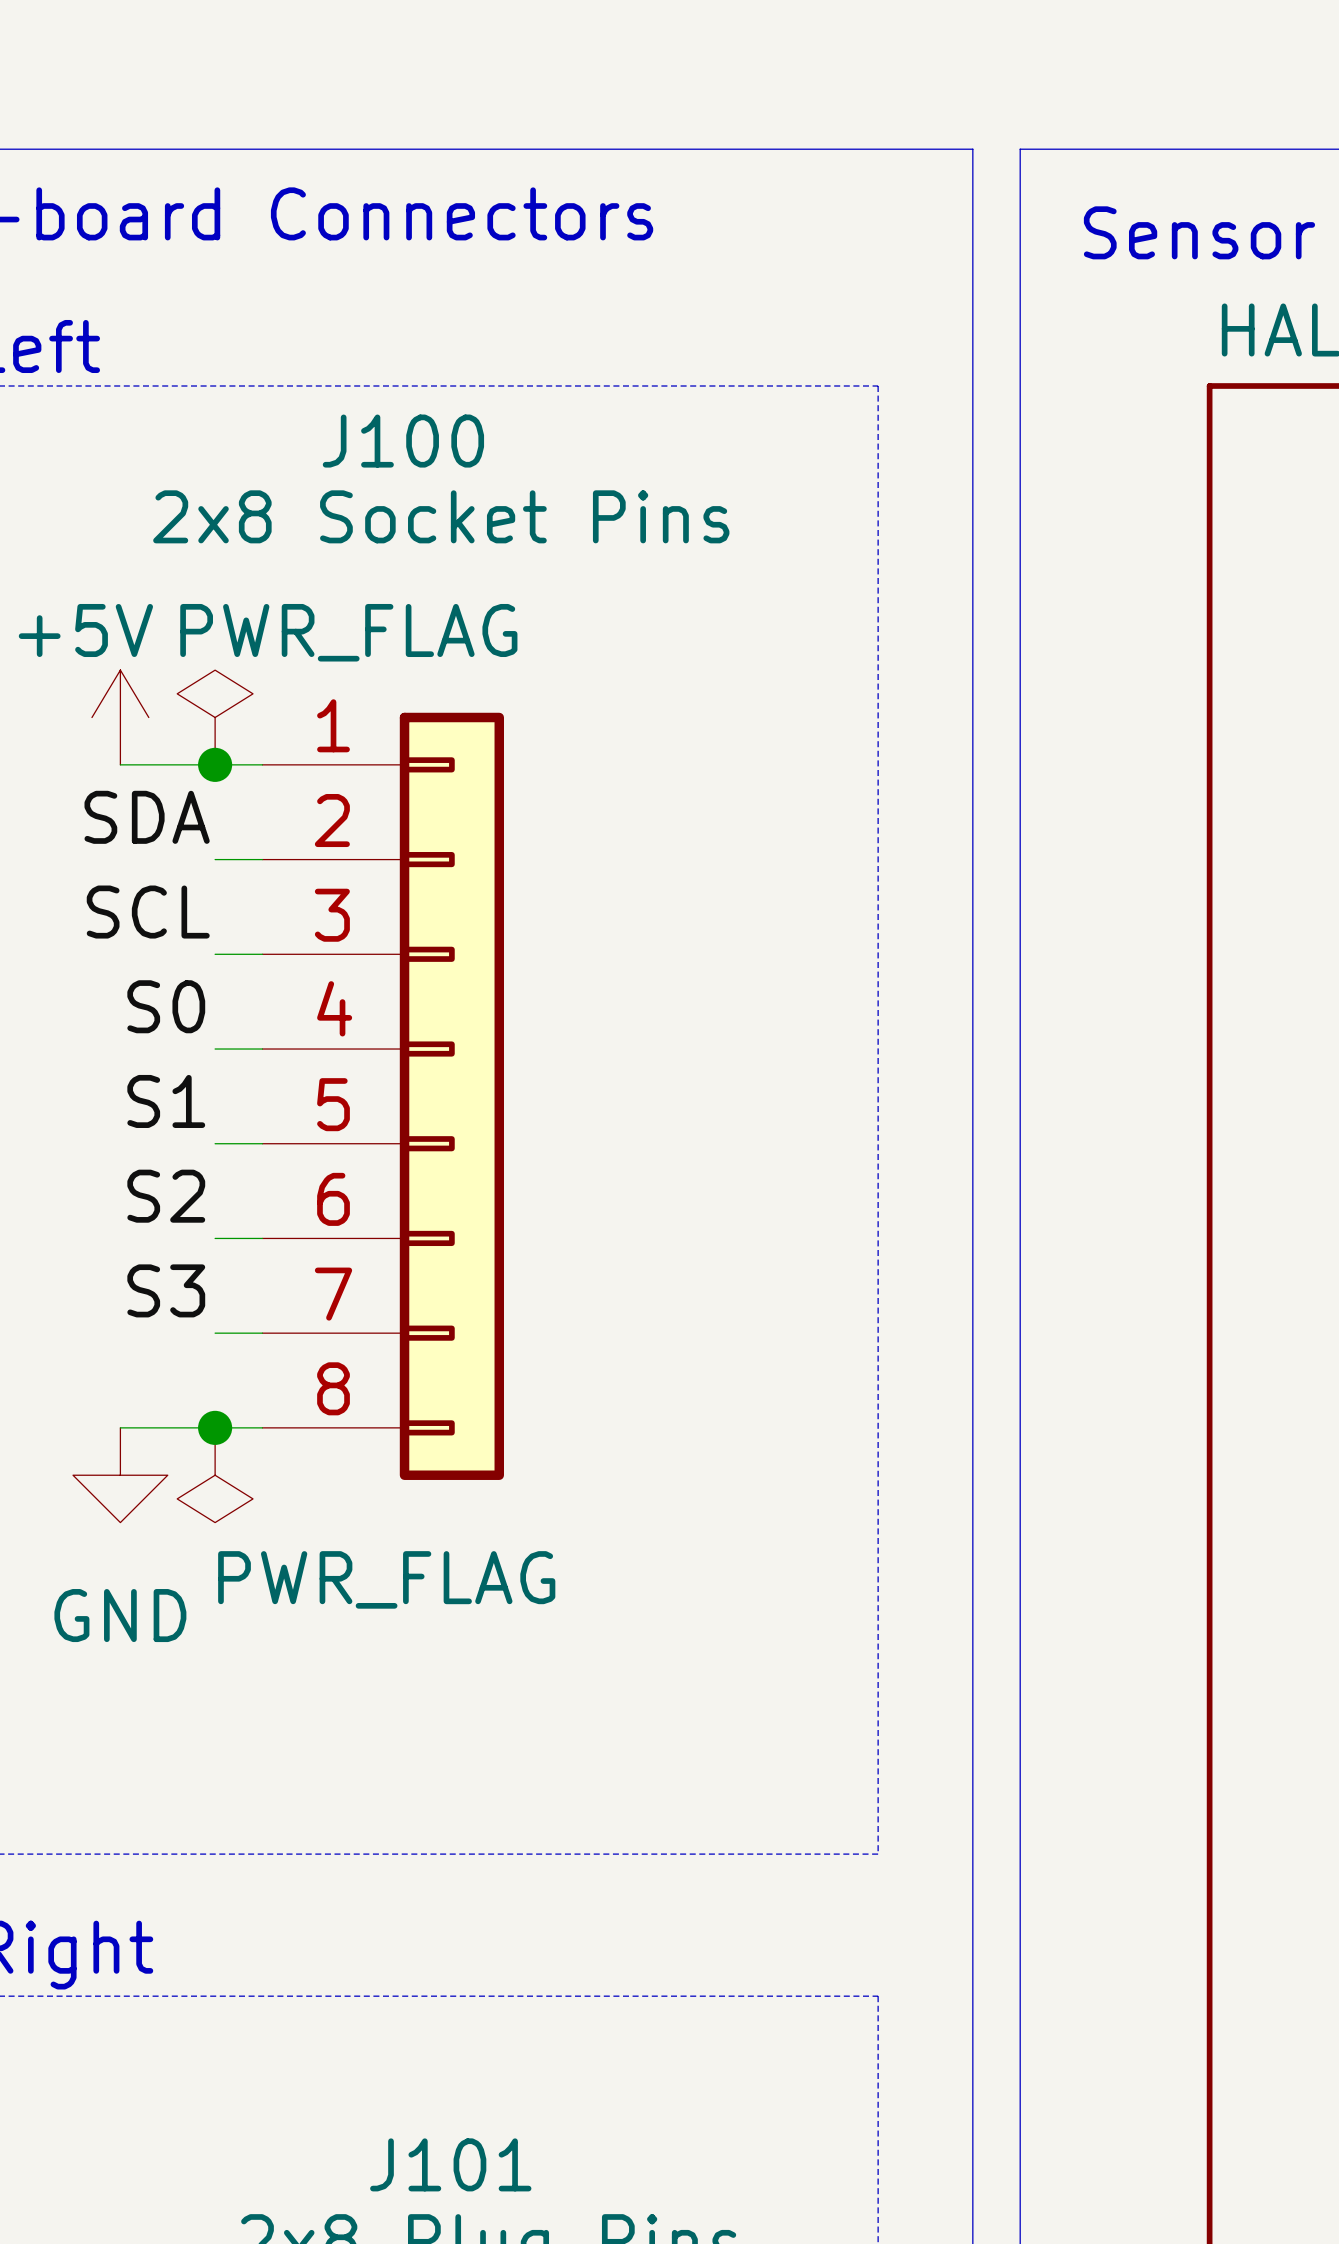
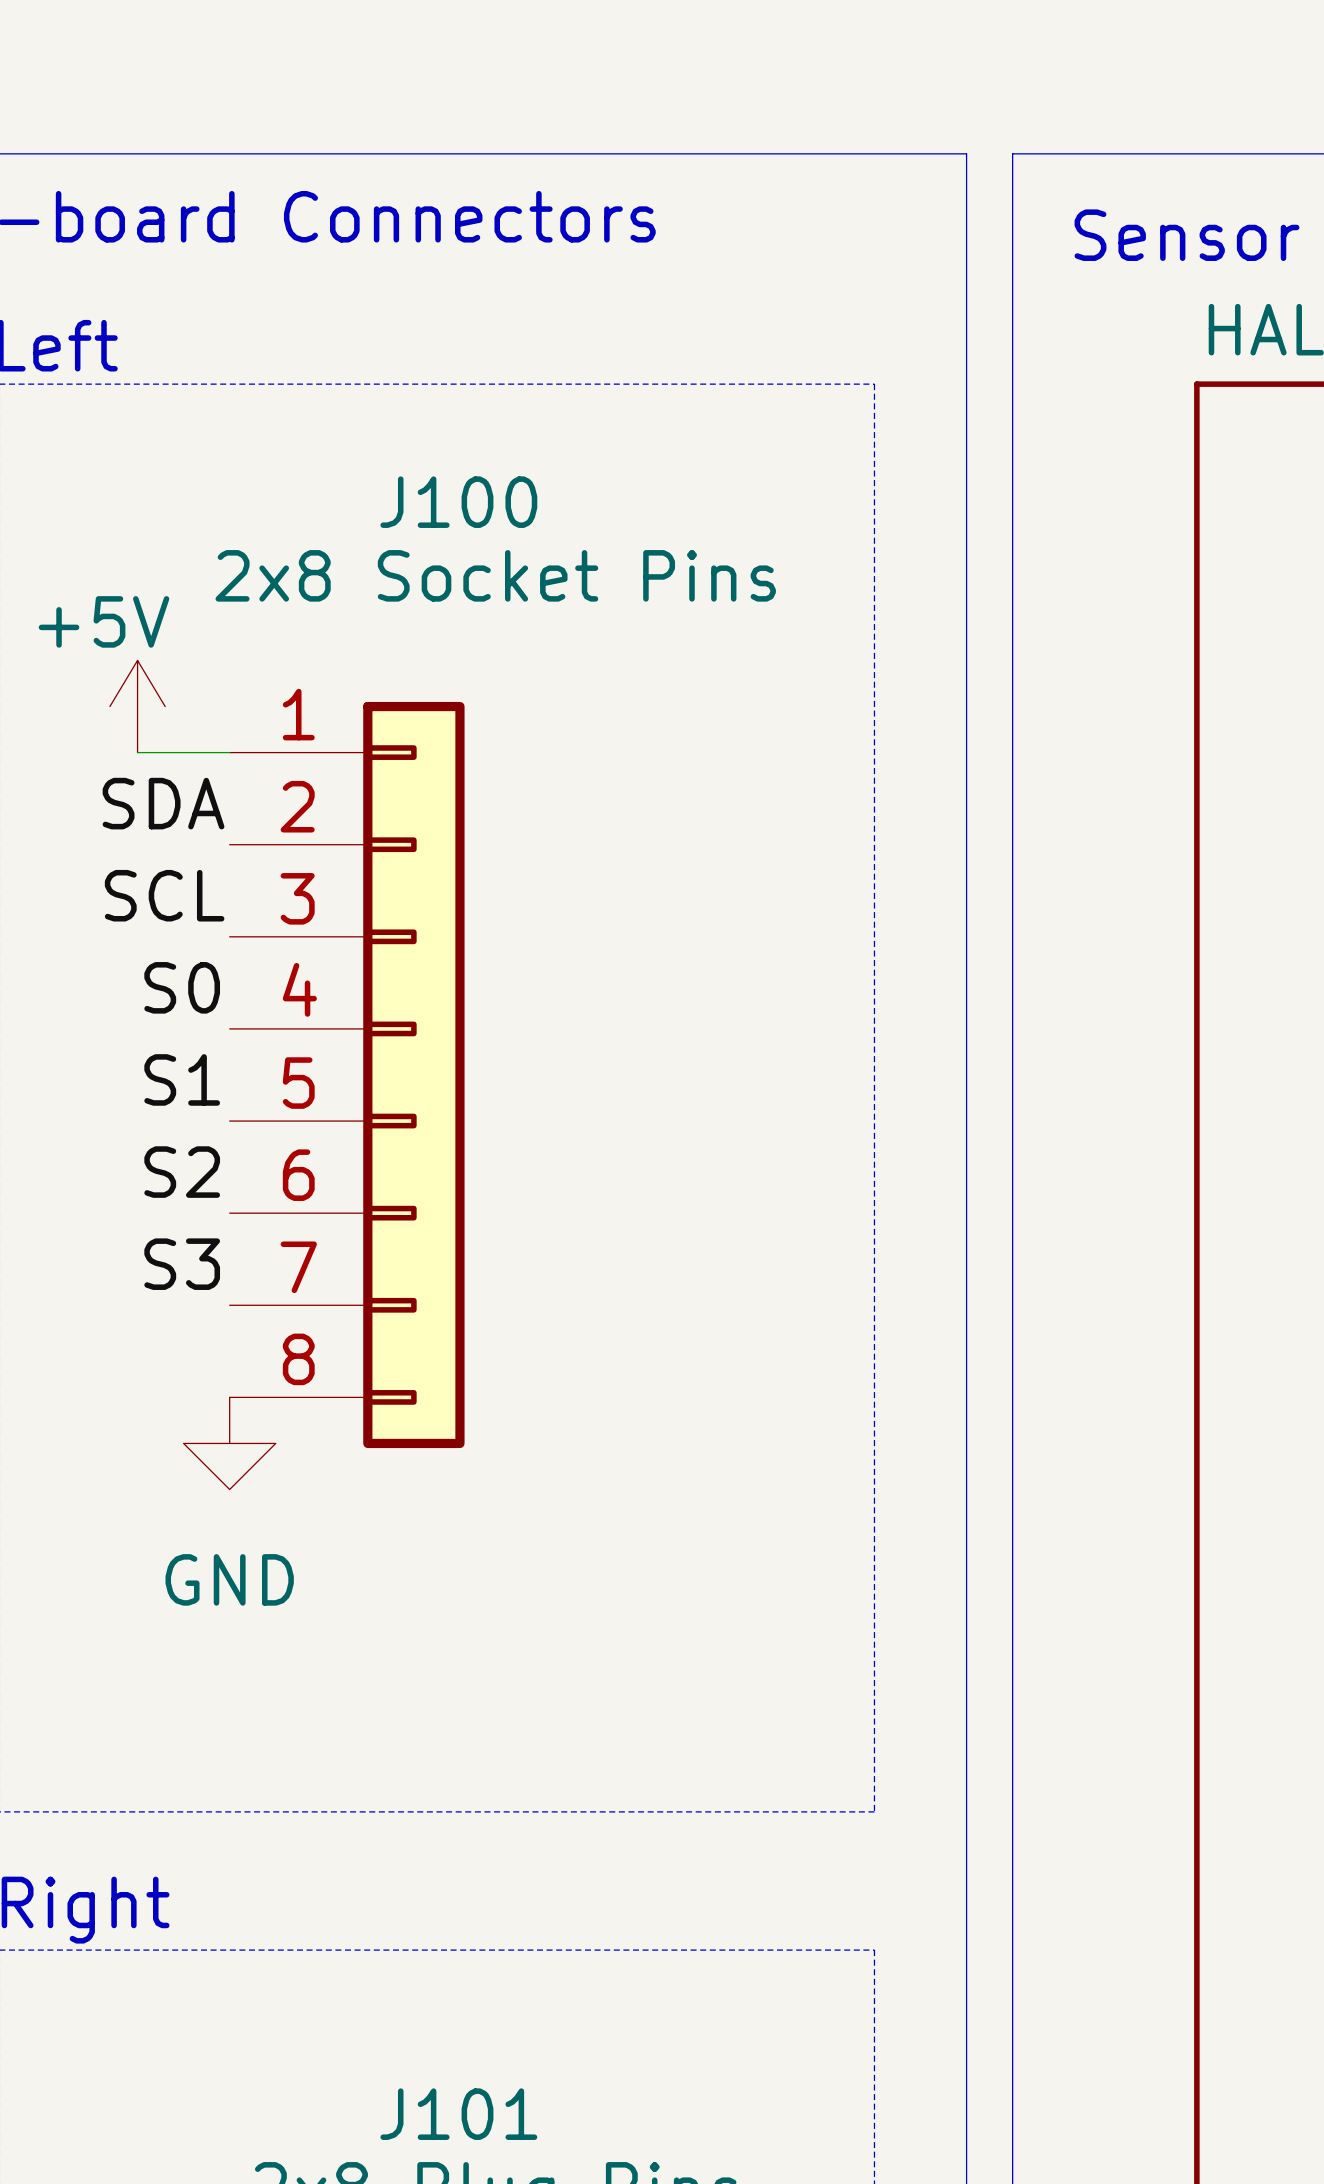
J100 name position: J100 (403, 441) -> J100 (458, 502)
J100 value position: 2x8 Socket Pins (441, 516) -> 2x8 Socket Pins (495, 575)
power symbol: PWR_FLAG (215, 717) -> none
junction: (215, 764) -> none
J100 position: (383, 1096) -> (347, 1074)
wire: (120, 1427) (262, 1427) -> none
junction: (215, 1427) -> none
power symbol: GND (120, 1475) -> none
power symbol: PWR_FLAG (215, 1475) -> GND (229, 1443)

